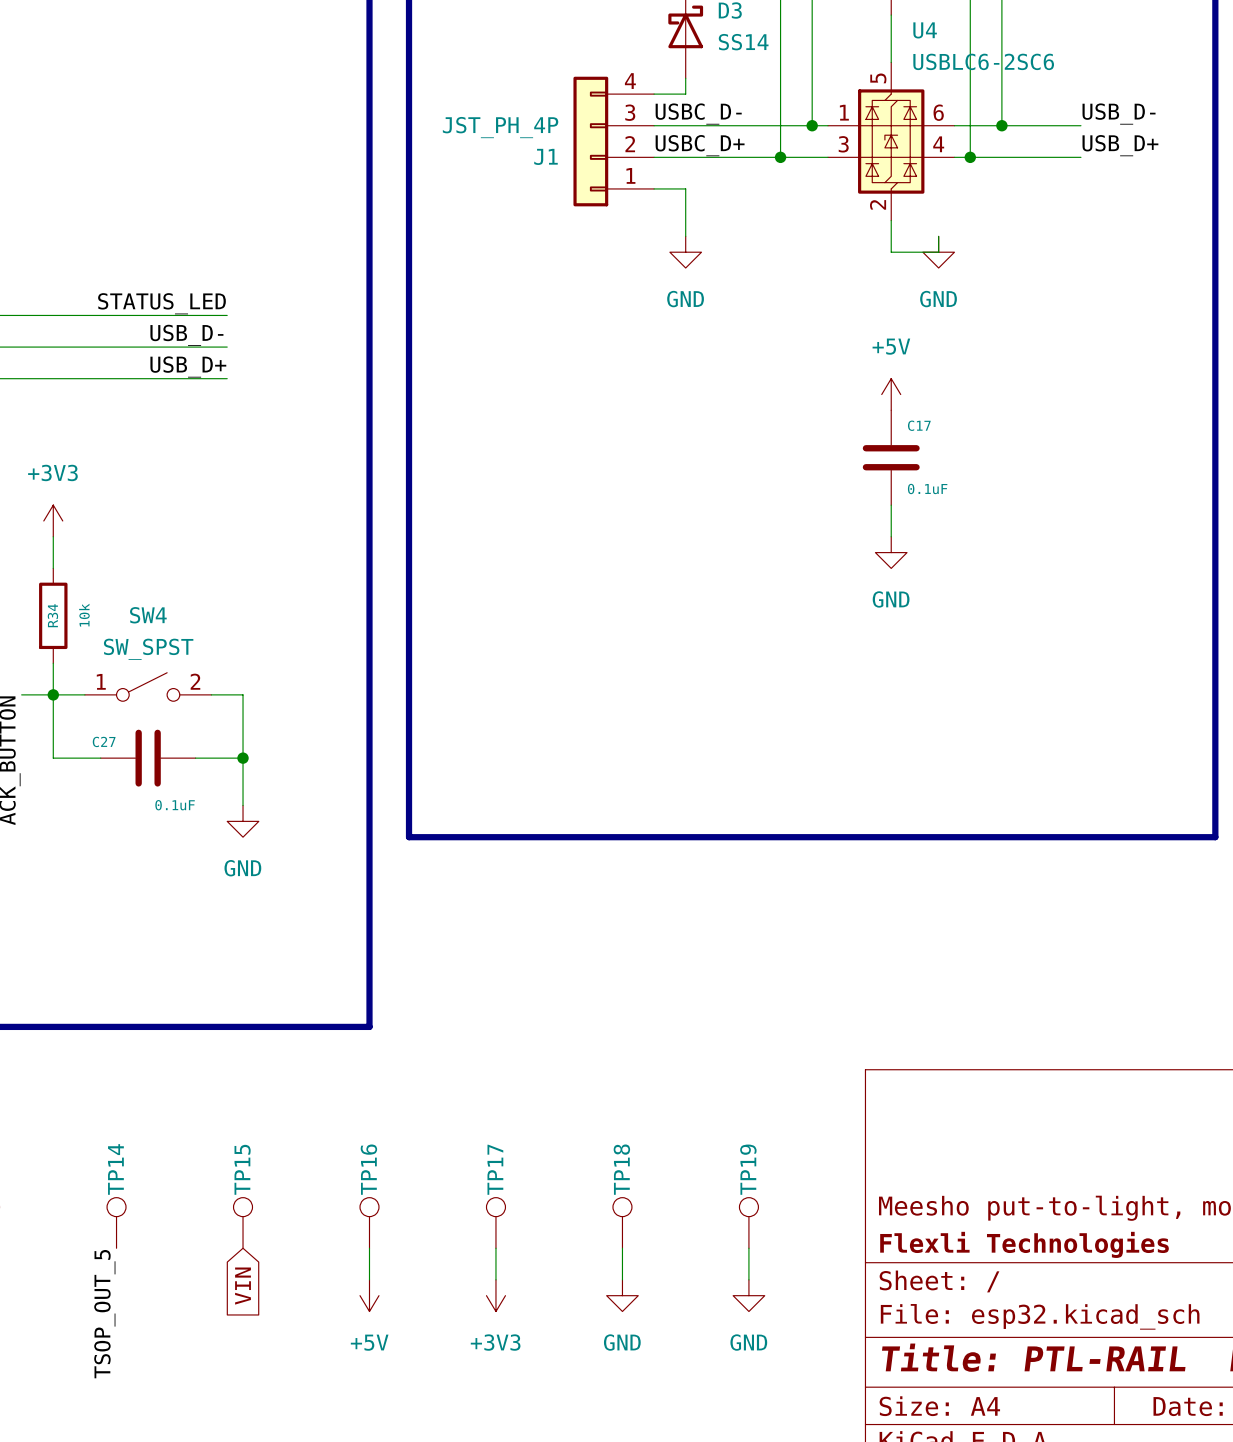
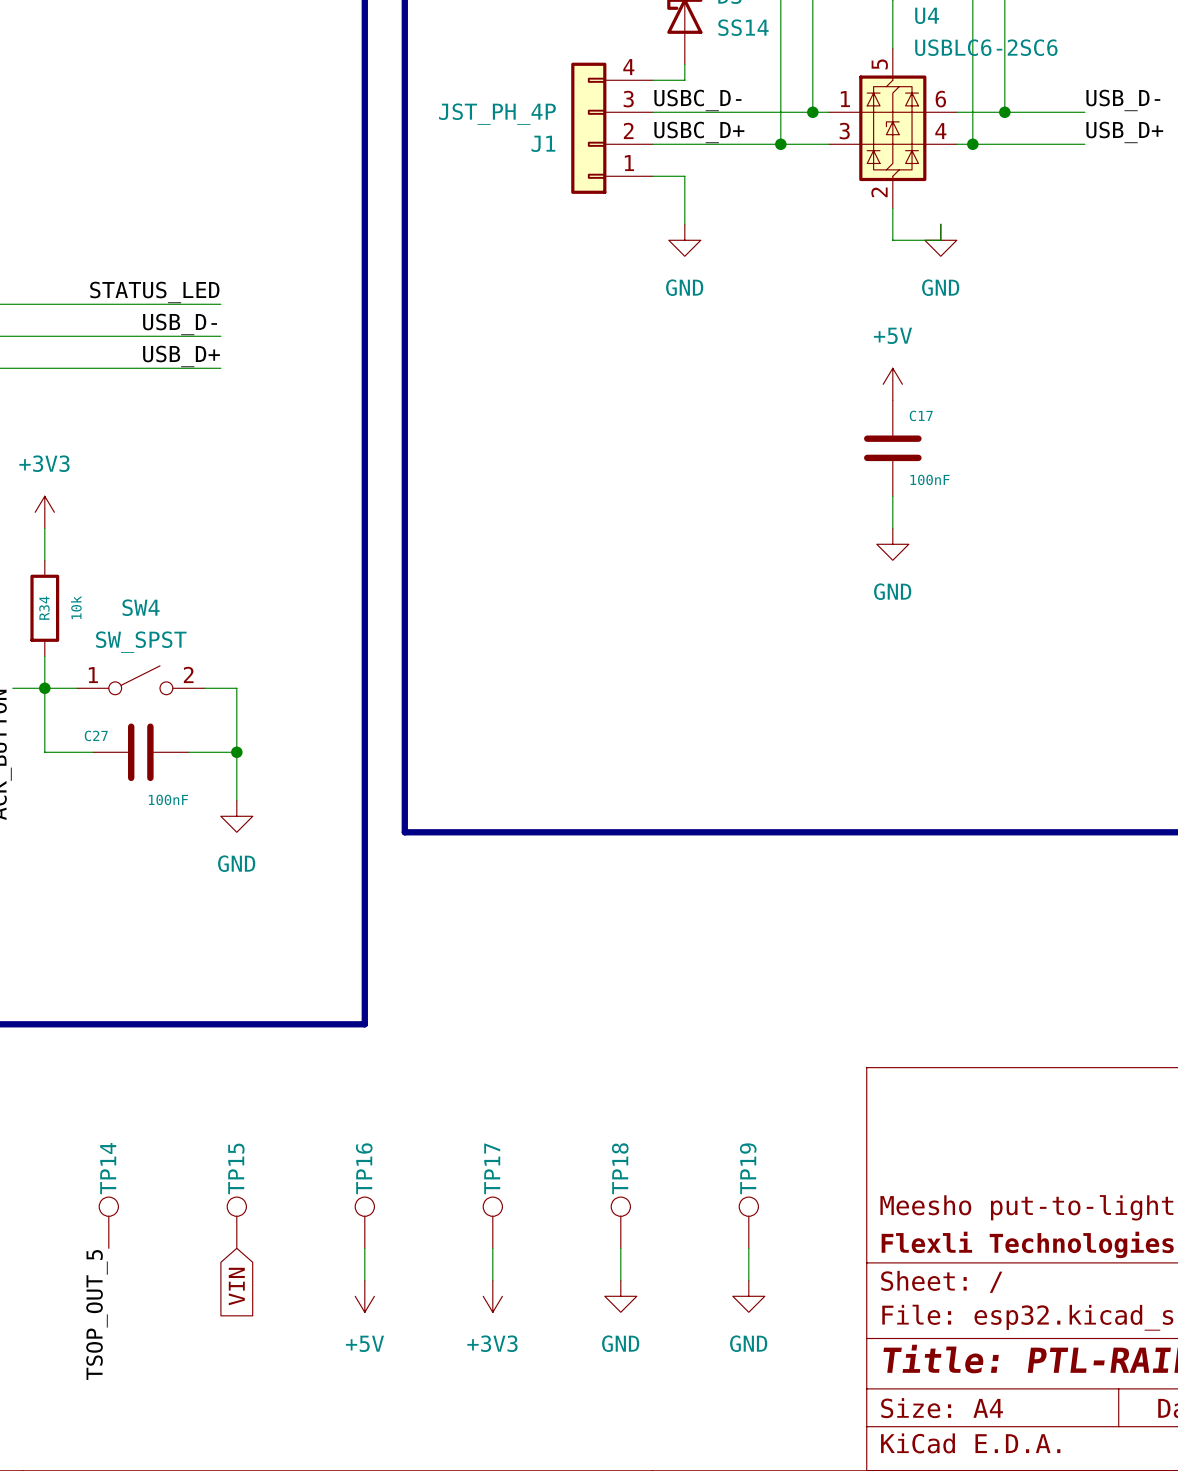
C17 value: 0.1uF (927, 488) -> 100nF (930, 479)
C27 value: 0.1uF (175, 805) -> 100nF (168, 799)

